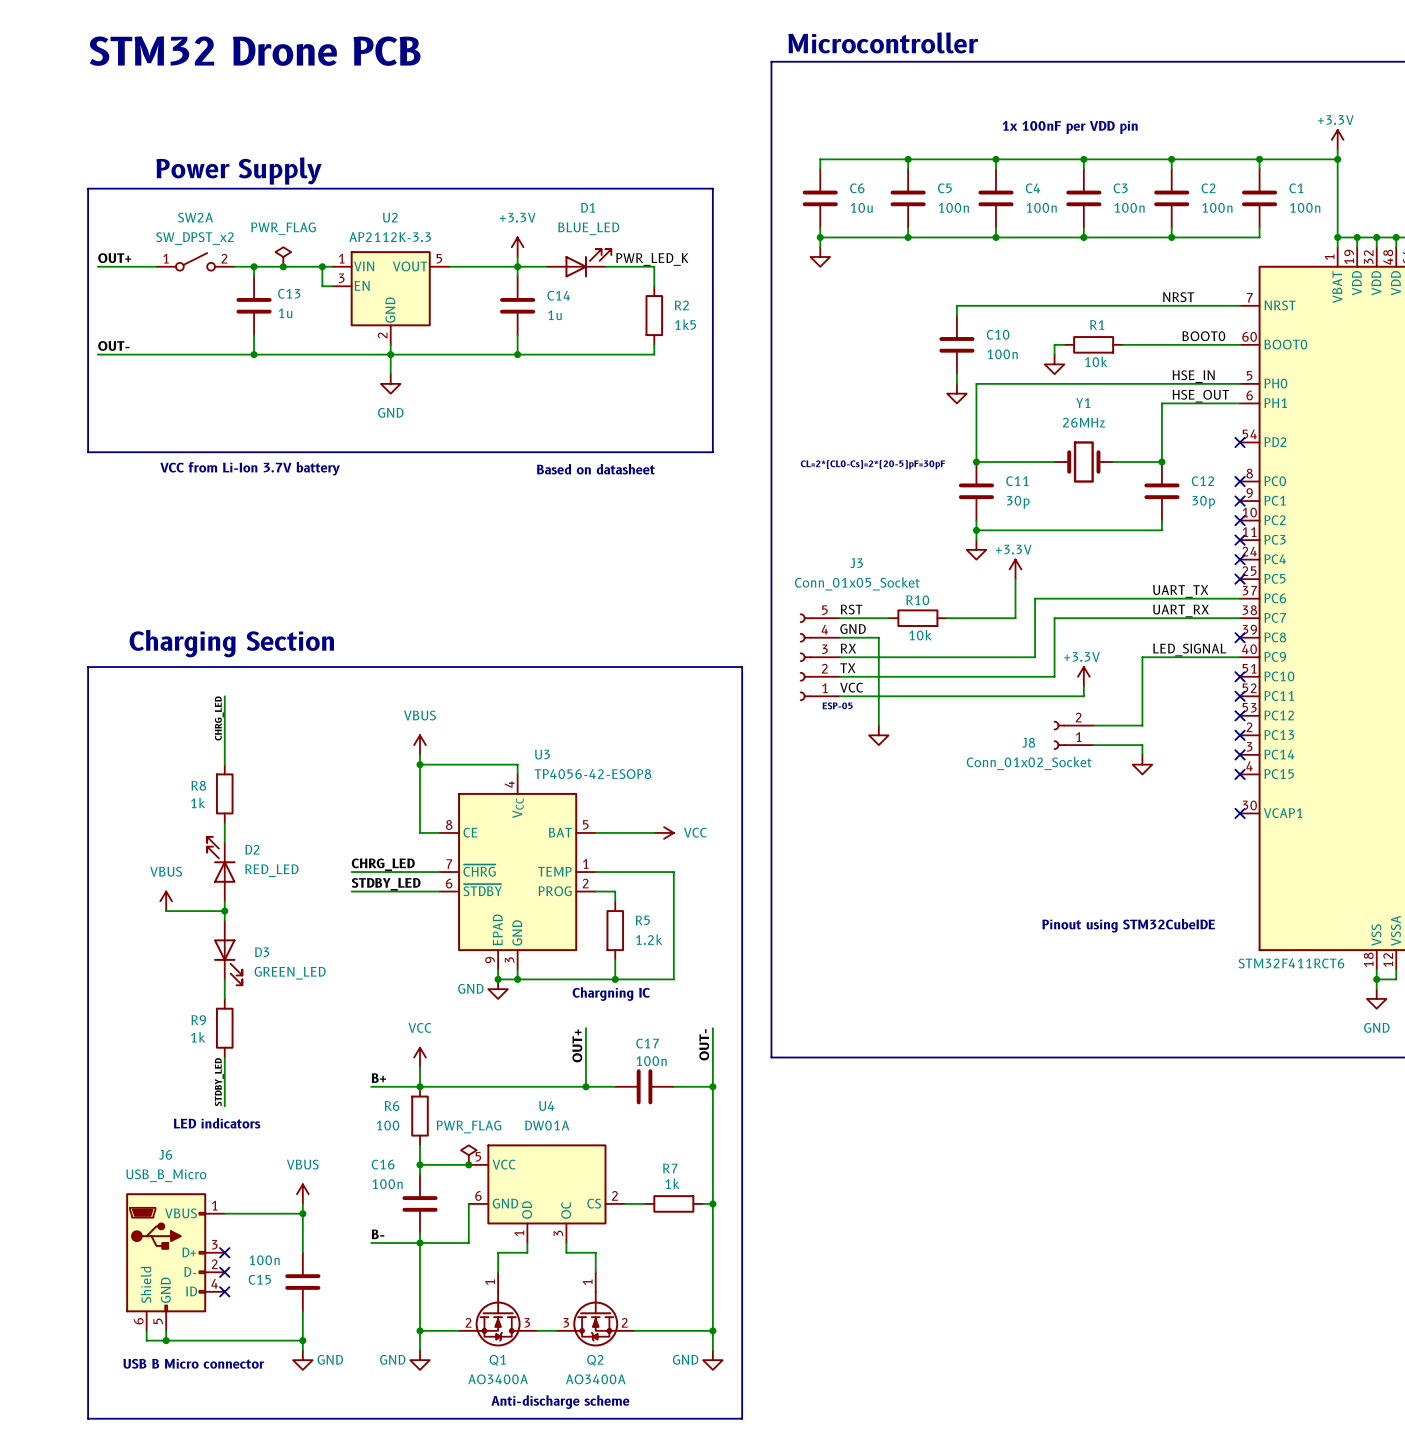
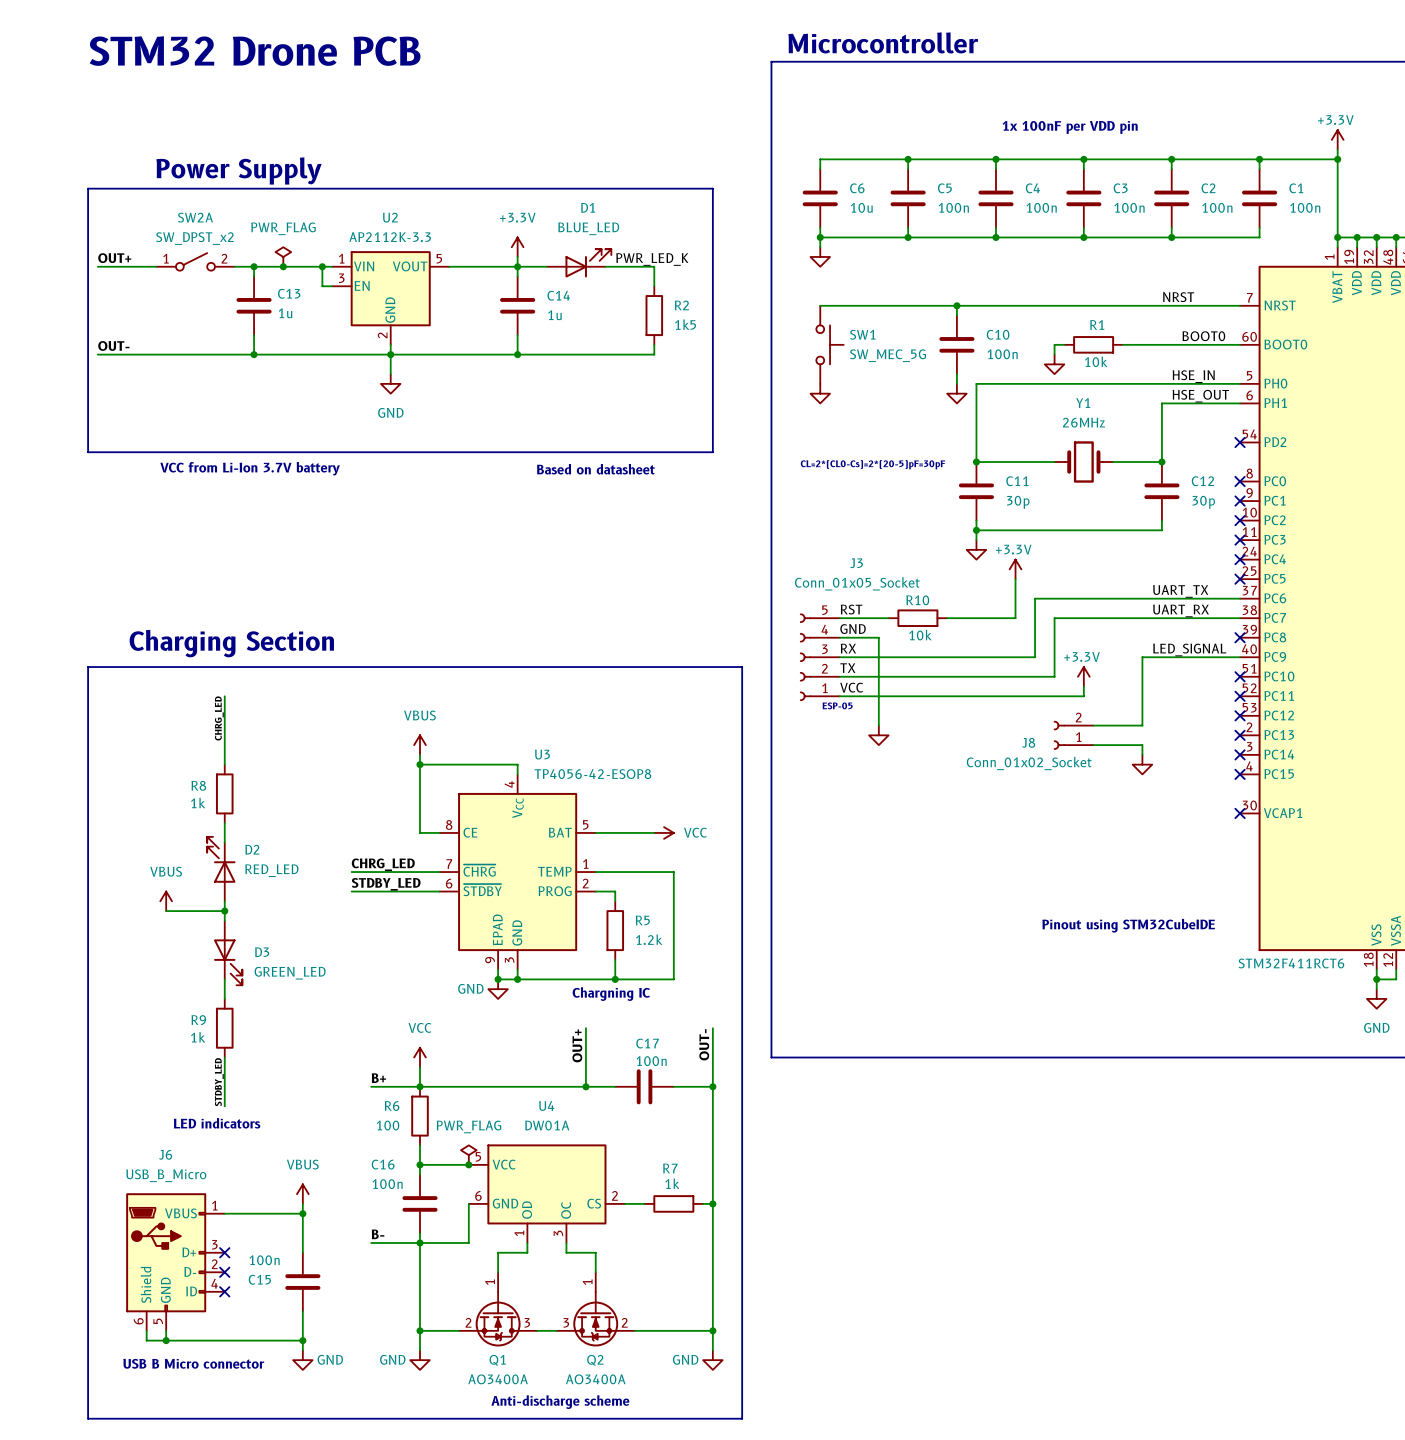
wire: none -> (820, 305) (956, 305)
junction: none -> (956, 305)
SW1: none -> SW_MEC_5G (830, 344)
power symbol: none -> (820, 393)

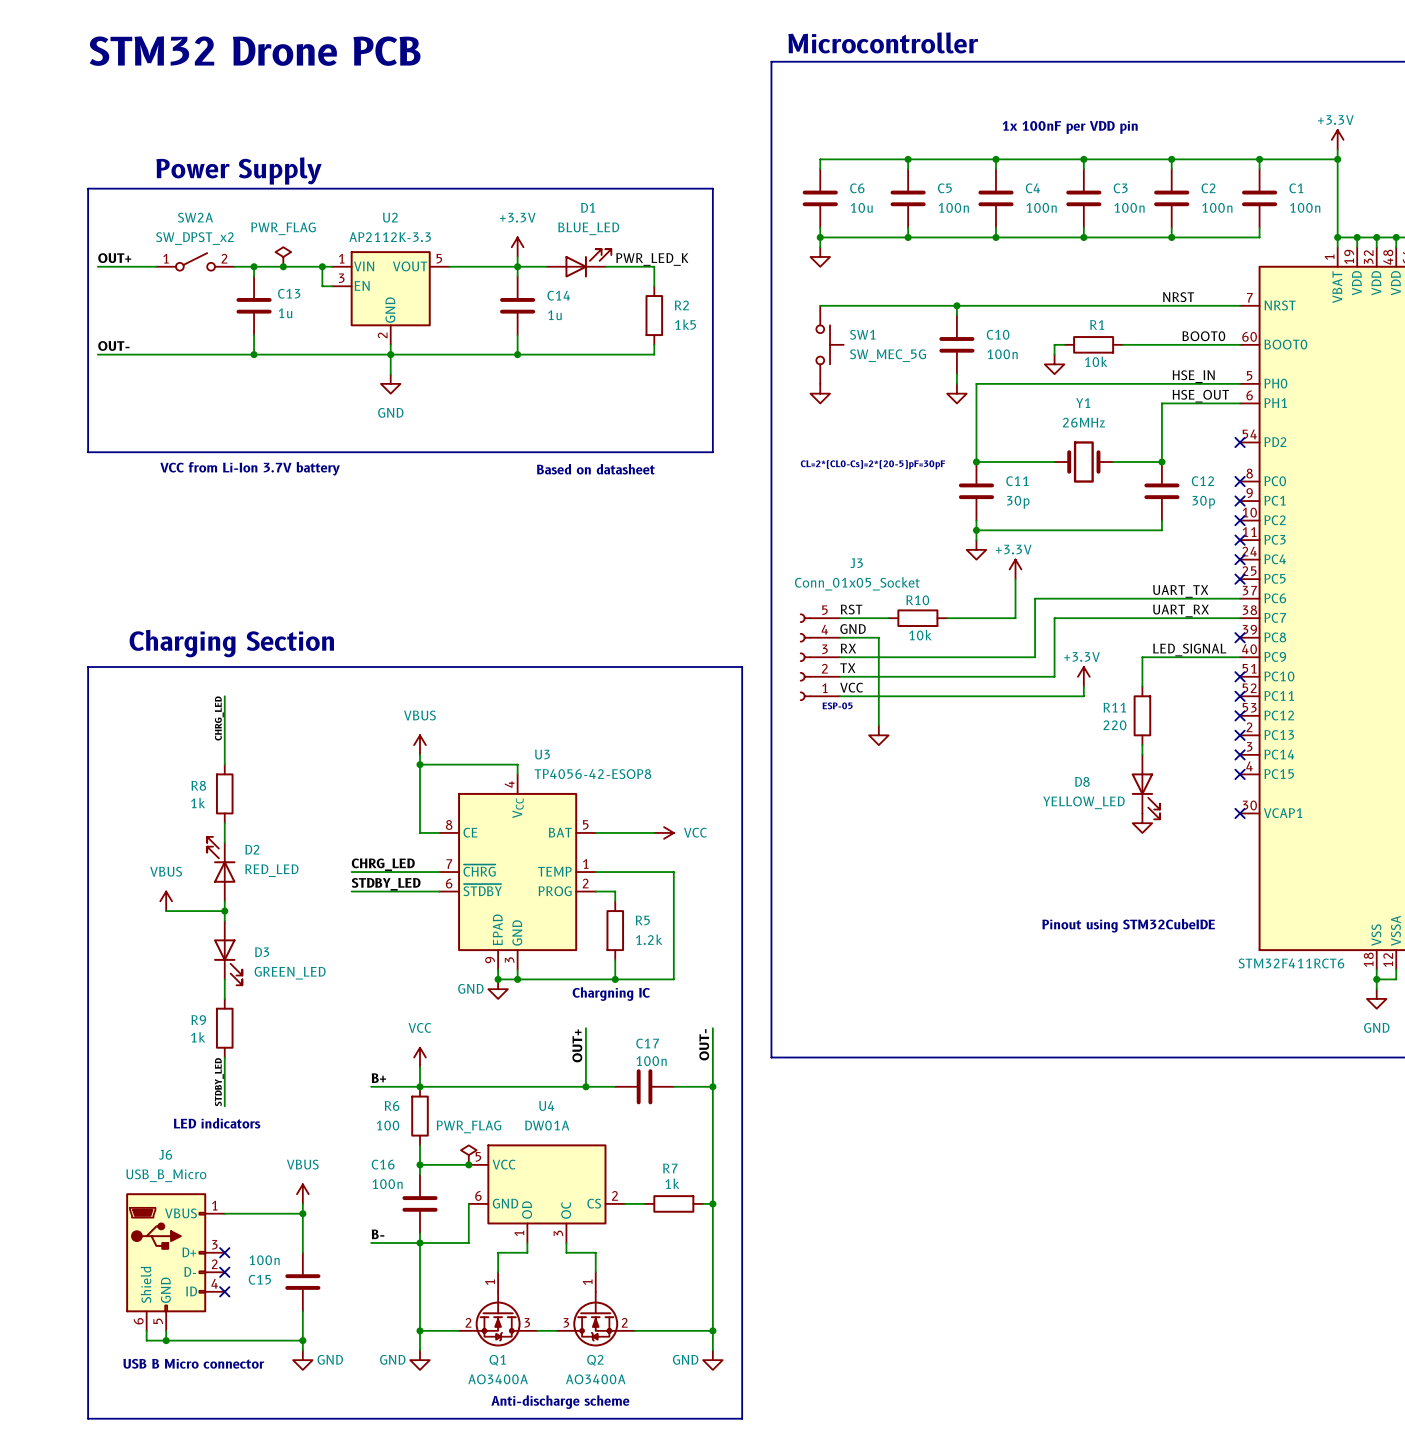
wire: (1142, 686) (1142, 725) (1093, 725) -> none
R11: none -> 220 (1142, 715)
J8: Conn_01x02_Socket (1073, 735) -> none
wire: (1093, 745) (1142, 745) -> none
power symbol position: (1142, 764) -> (1142, 823)
D8: none -> YELLOW_LED (1145, 787)

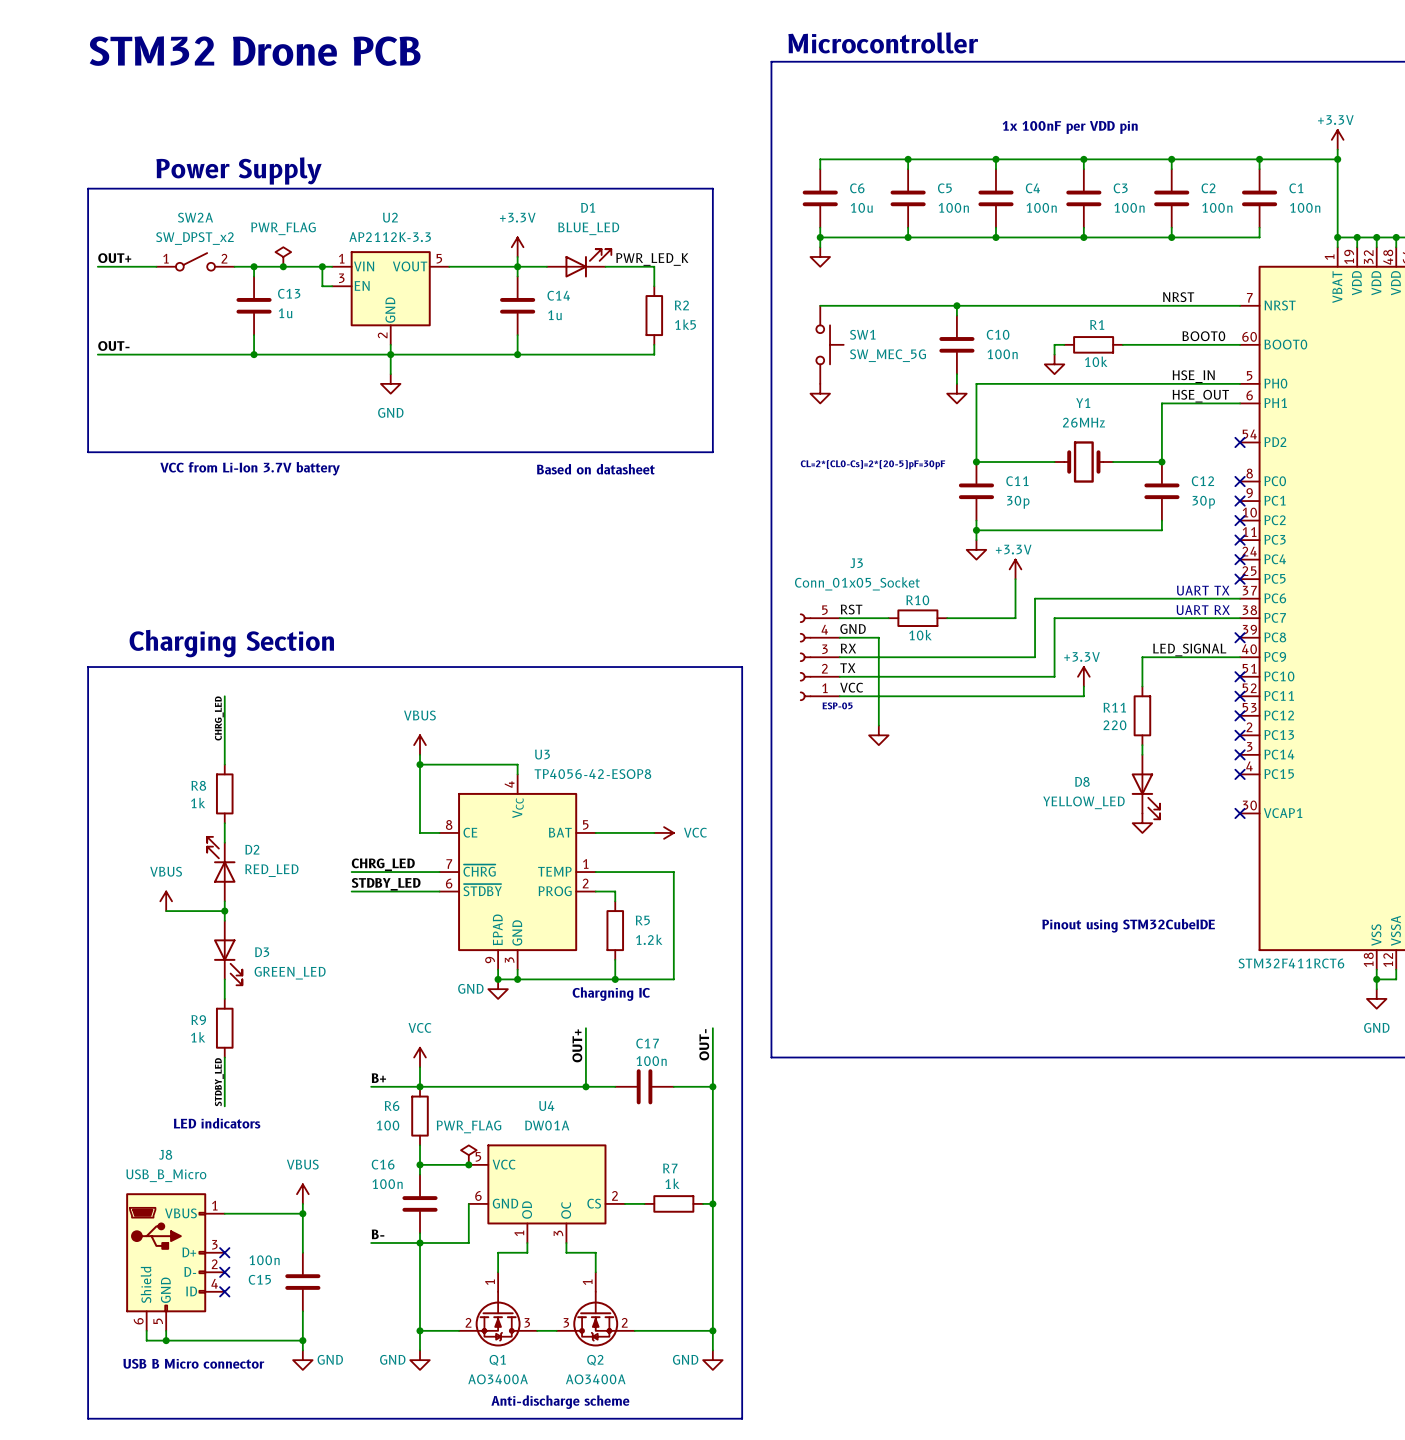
text: none -> UART TX (1203, 590)
label: UART_TX (1180, 591) -> none
label: UART_RX (1181, 610) -> none
text: none -> UART RX (1203, 610)
J6 name: J6 (165, 1154) -> J8 (165, 1154)

